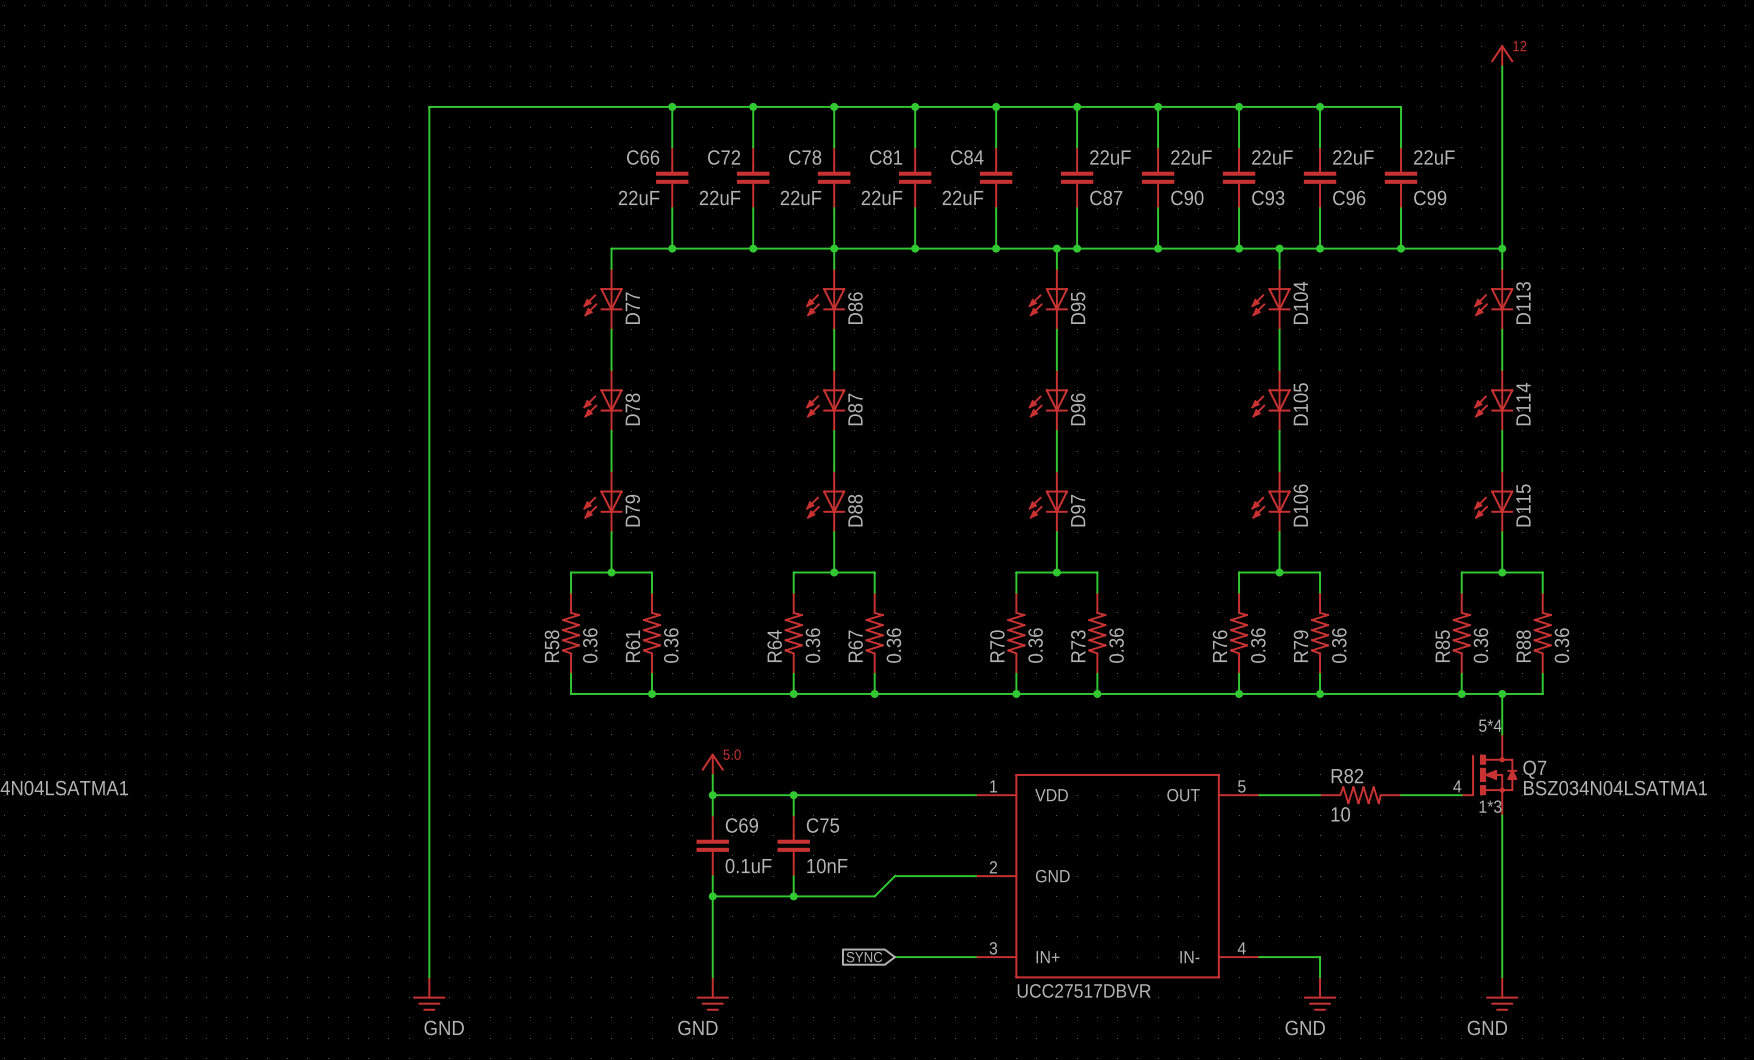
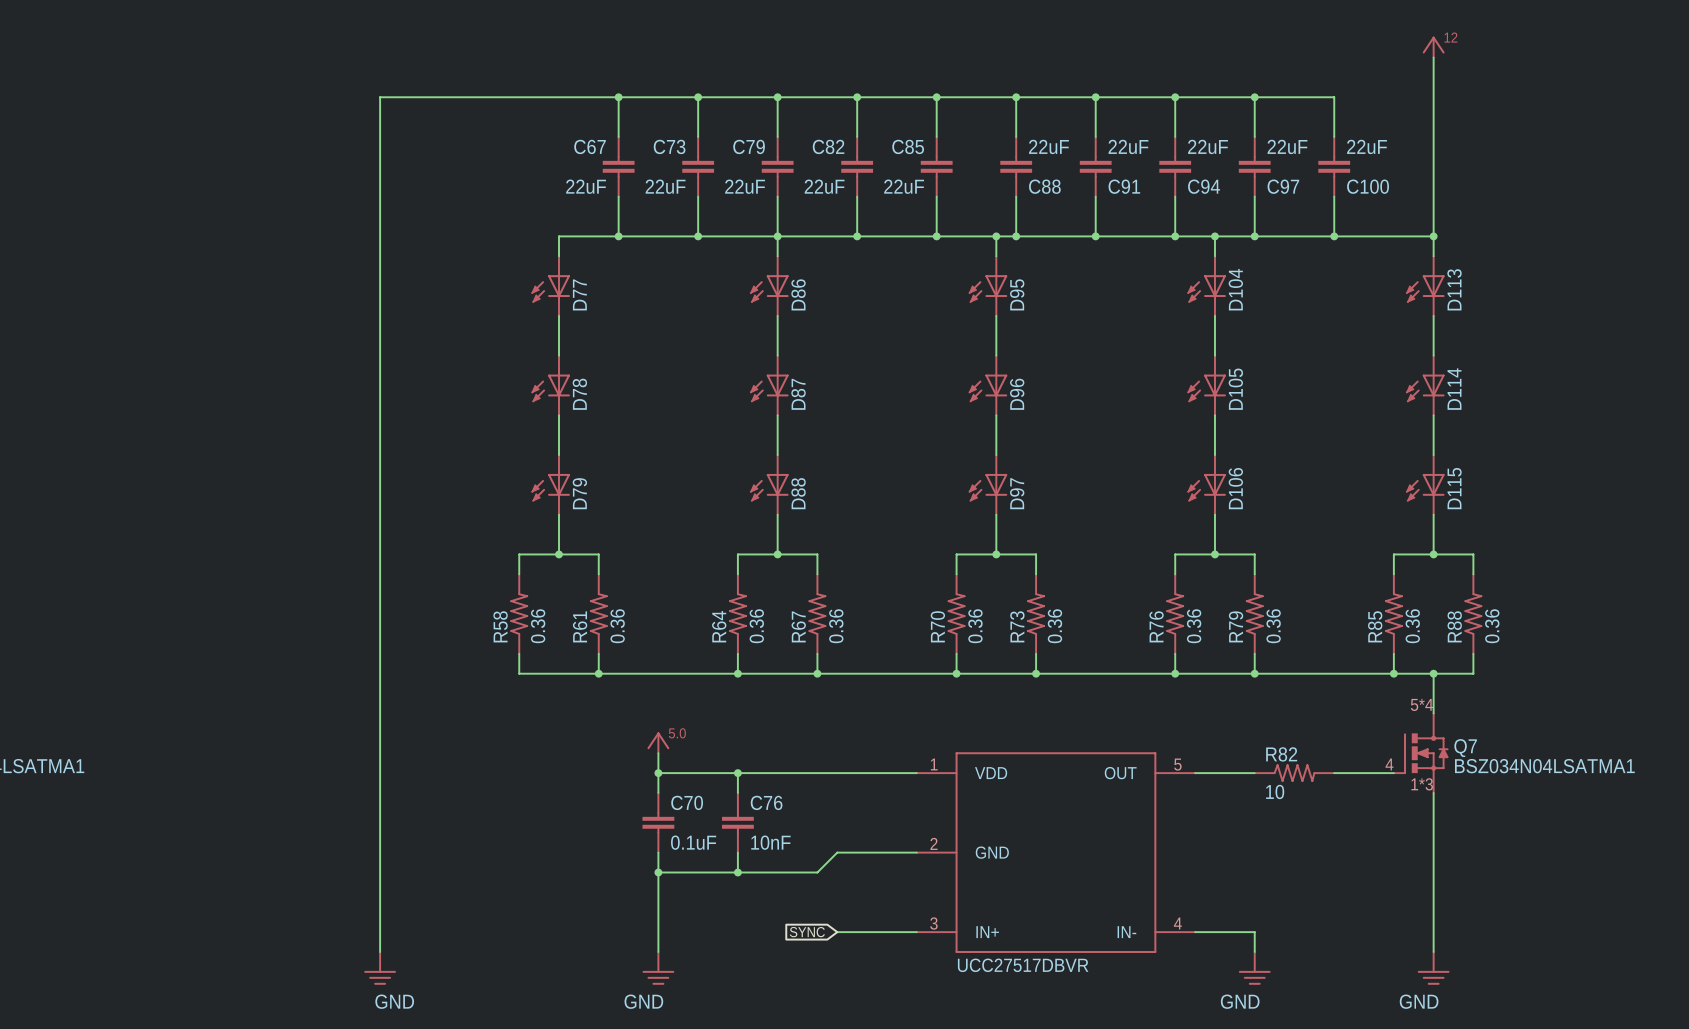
C66 name: C66 (643, 157) -> C67 (590, 146)
C72 name: C72 (724, 157) -> C73 (669, 146)
C78 name: C78 (805, 157) -> C79 (749, 146)
C81 name: C81 (886, 157) -> C82 (828, 146)
C84 name: C84 (967, 157) -> C85 (908, 146)
C87 name: C87 (1106, 198) -> C88 (1044, 186)
C90 name: C90 (1187, 198) -> C91 (1124, 186)
C93 name: C93 (1268, 198) -> C94 (1204, 186)
C96 name: C96 (1349, 198) -> C97 (1283, 186)
C99 name: C99 (1430, 198) -> C100 (1368, 186)
C69 name: C69 (741, 825) -> C70 (687, 802)
C75 name: C75 (822, 825) -> C76 (766, 802)

